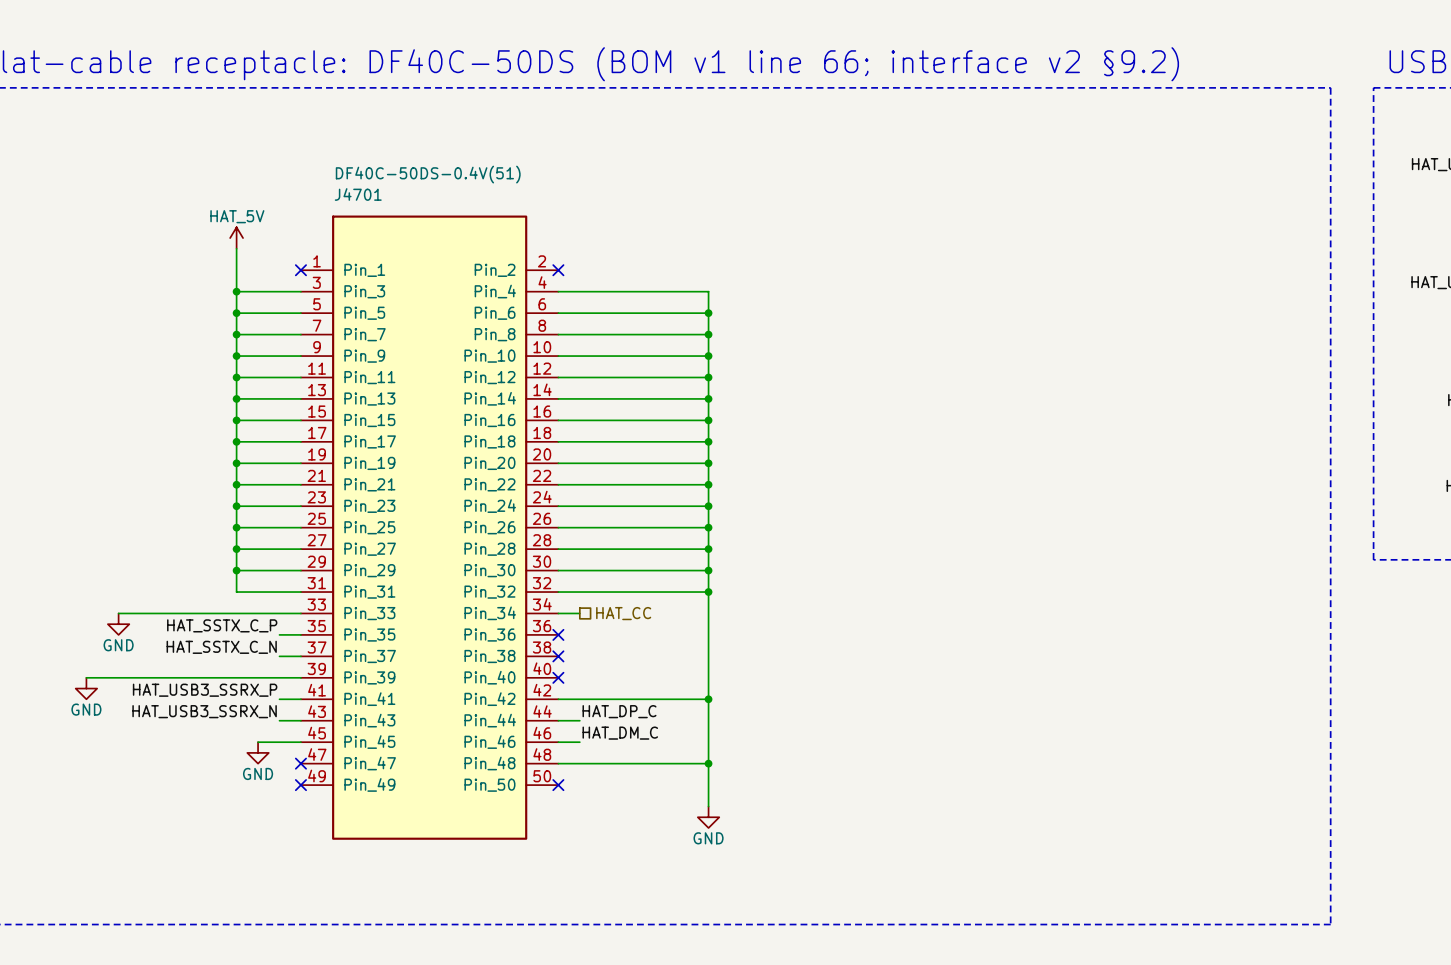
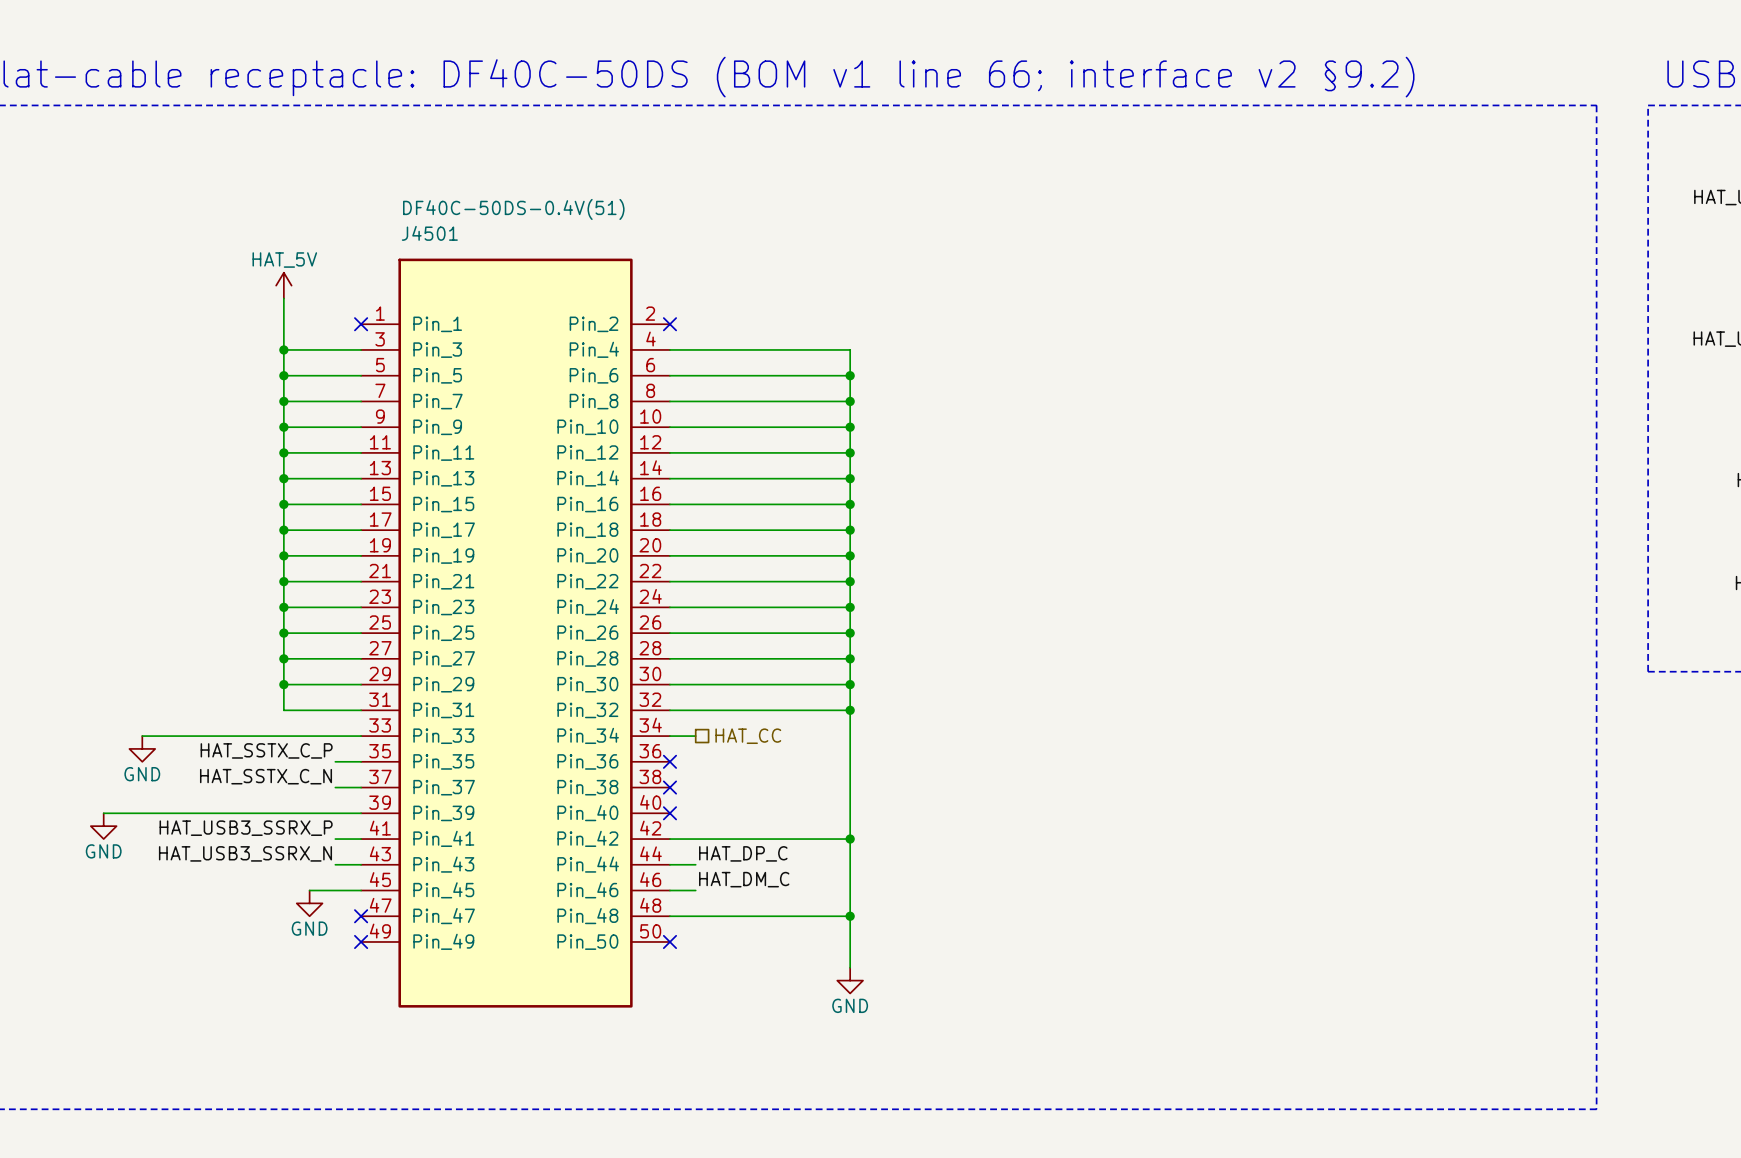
J4701 name: J4701 (358, 194) -> J4501 (429, 233)

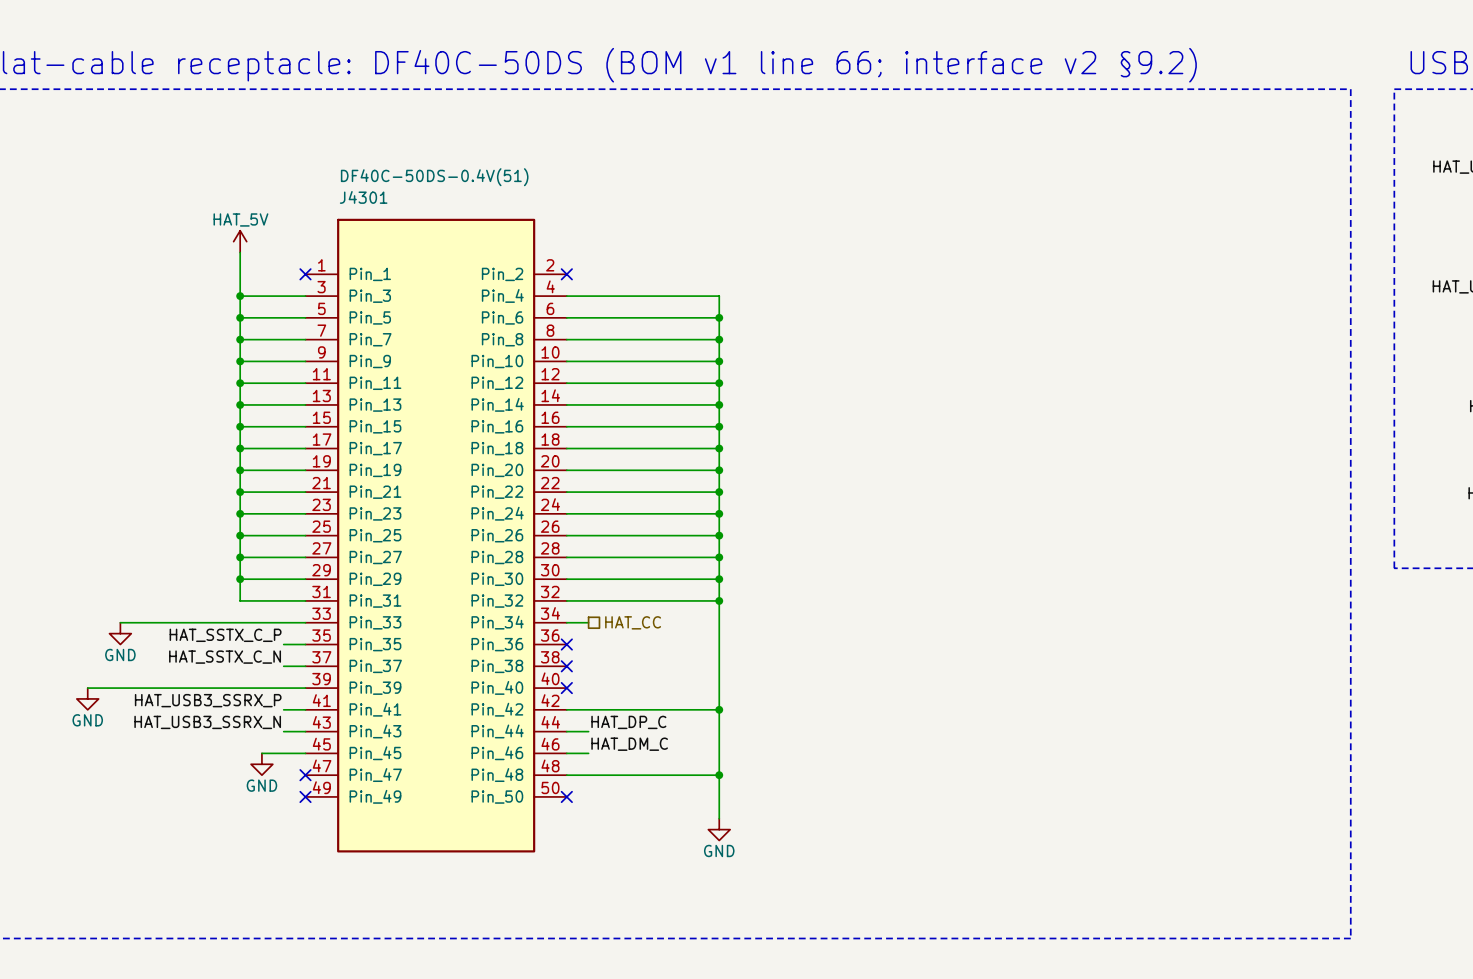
J4501 name: J4501 (429, 233) -> J4301 (363, 197)

